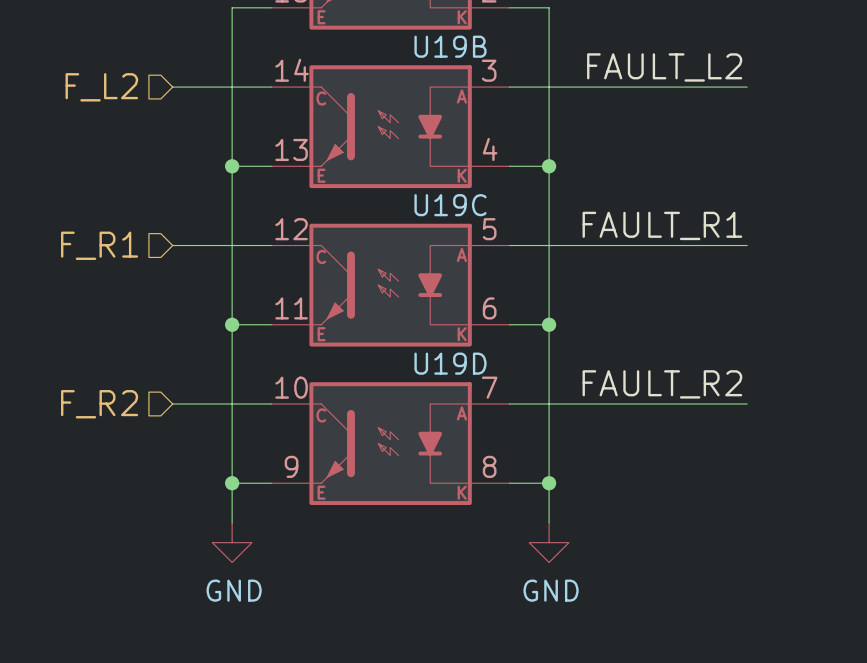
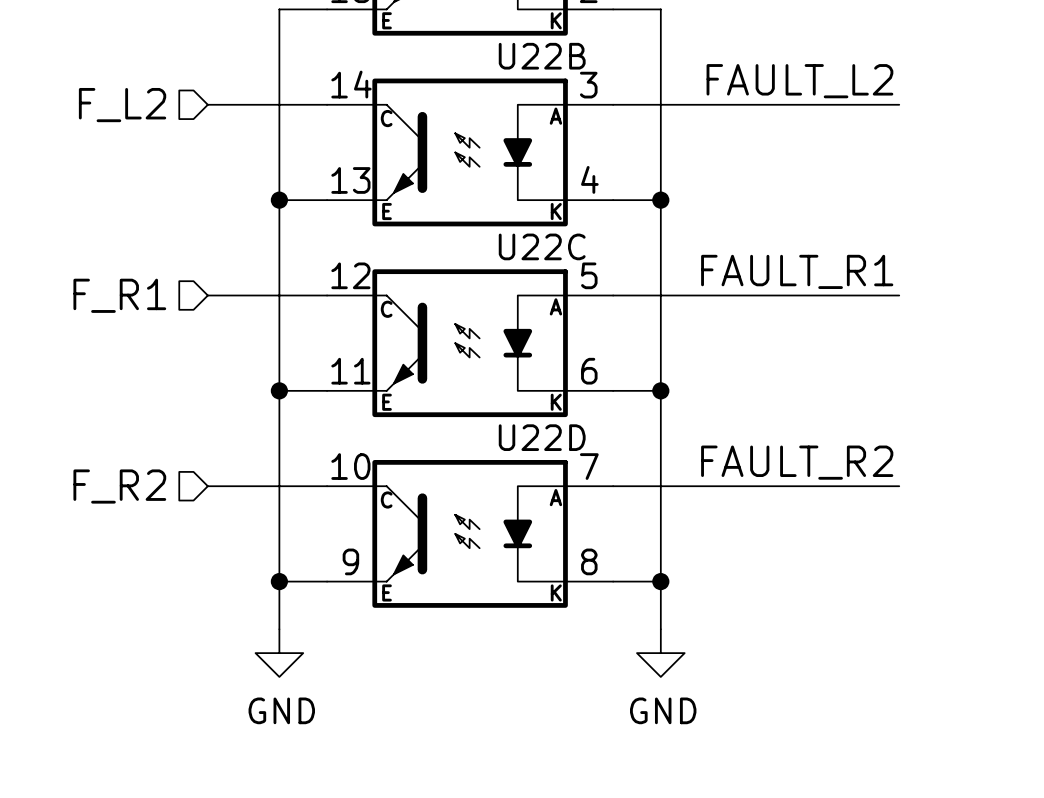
U19B name: U19B (450, 46) -> U22B (542, 56)
U19C name: U19C (450, 205) -> U22C (542, 246)
U19D name: U19D (450, 363) -> U22D (542, 437)

